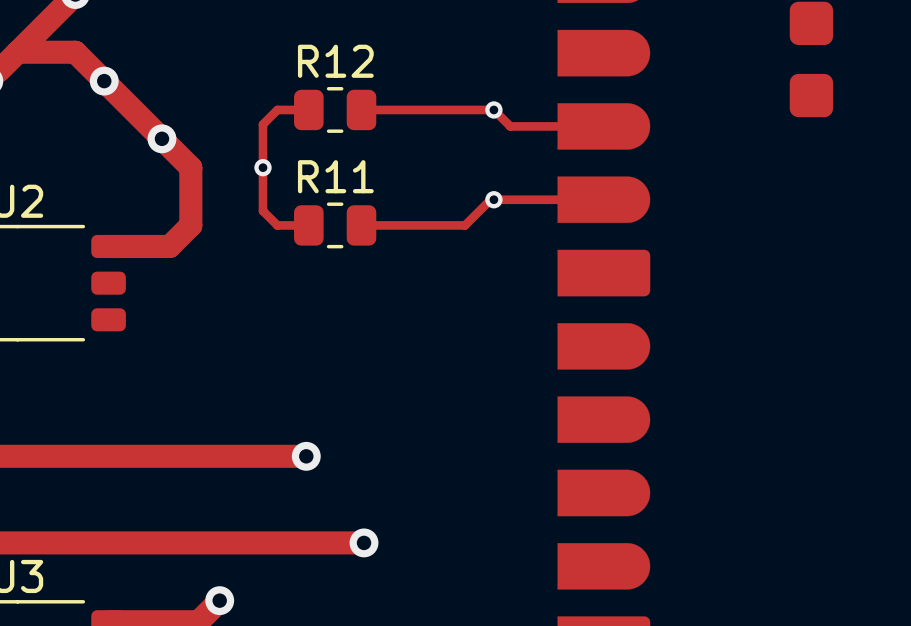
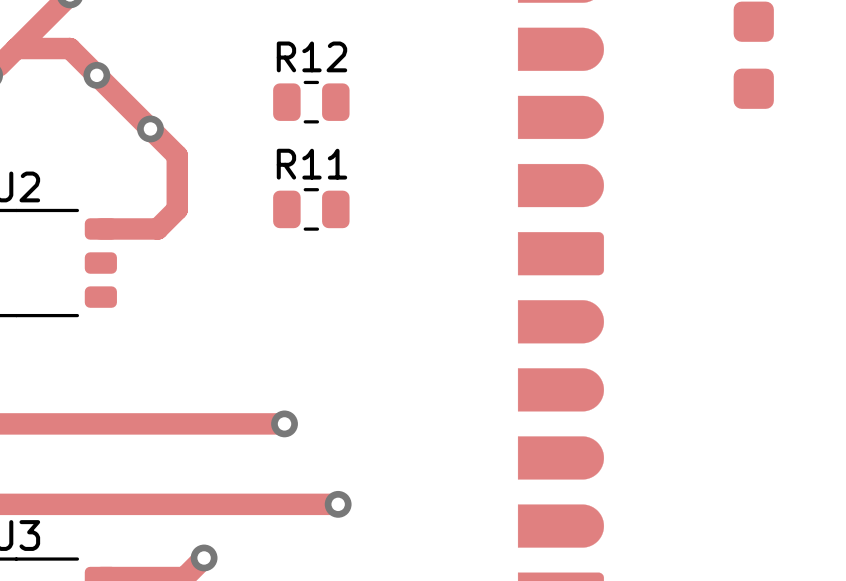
track: (308, 109) (277, 109) (263, 124) (263, 210) (277, 225) (308, 225) -> none
track: (361, 109) (493, 109) (510, 126) (603, 126) -> none
via: (493, 109) -> none
via: (263, 167) -> none
via: (493, 199) -> none
track: (603, 199) (490, 199) (465, 225) (361, 225) -> none

